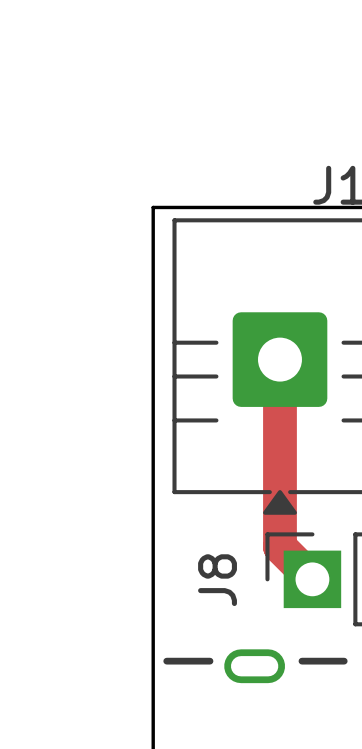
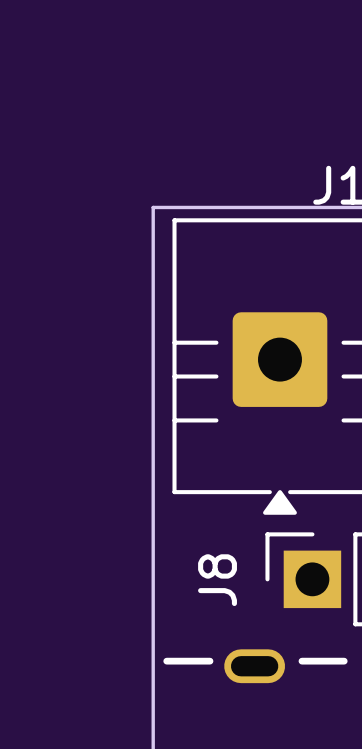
track: (279, 359) (279, 546) (312, 579) -> none

